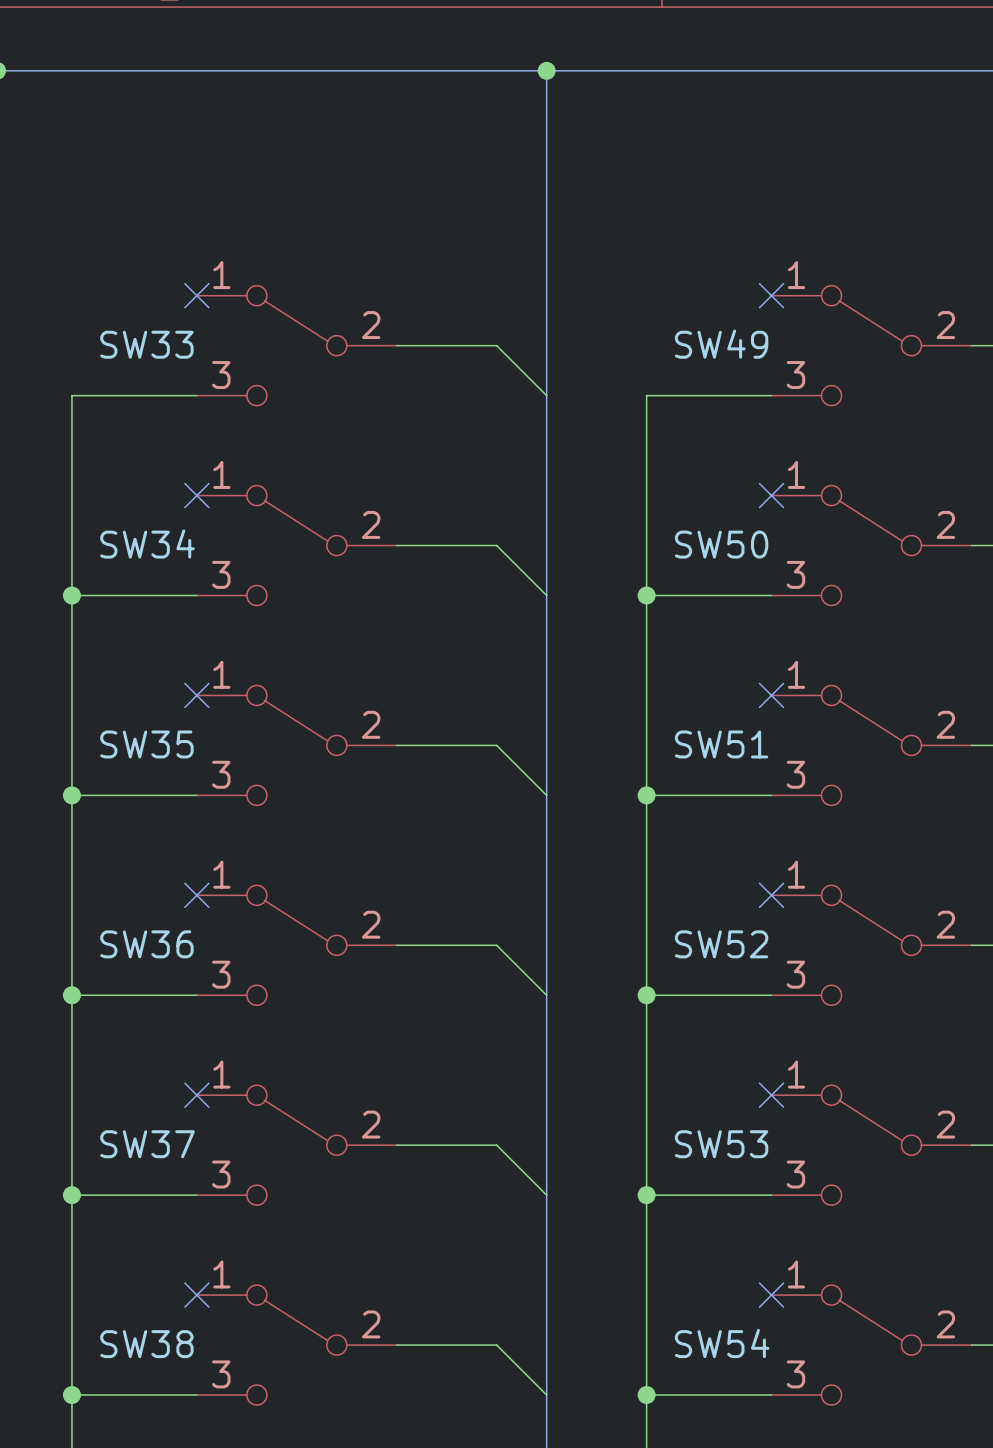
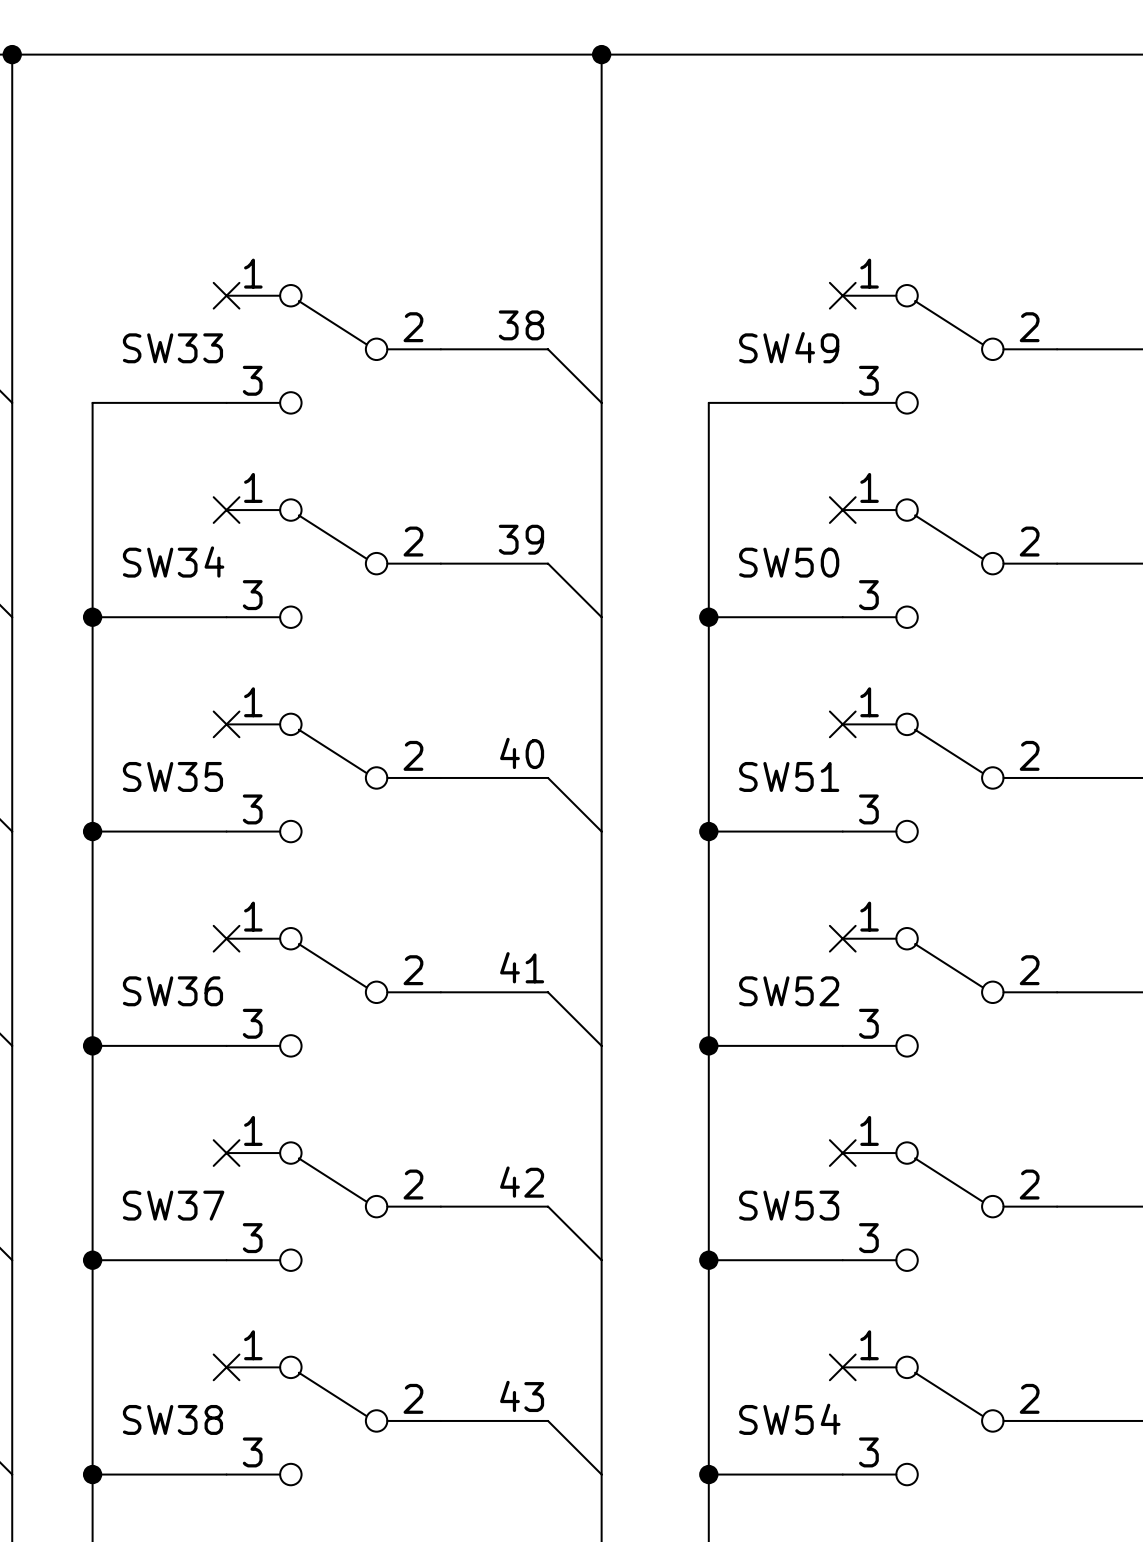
label: none -> 38 (521, 325)
label: none -> 39 (521, 539)
label: none -> 40 (522, 753)
label: none -> 41 (522, 967)
label: none -> 42 (522, 1182)
label: none -> 43 (522, 1396)

